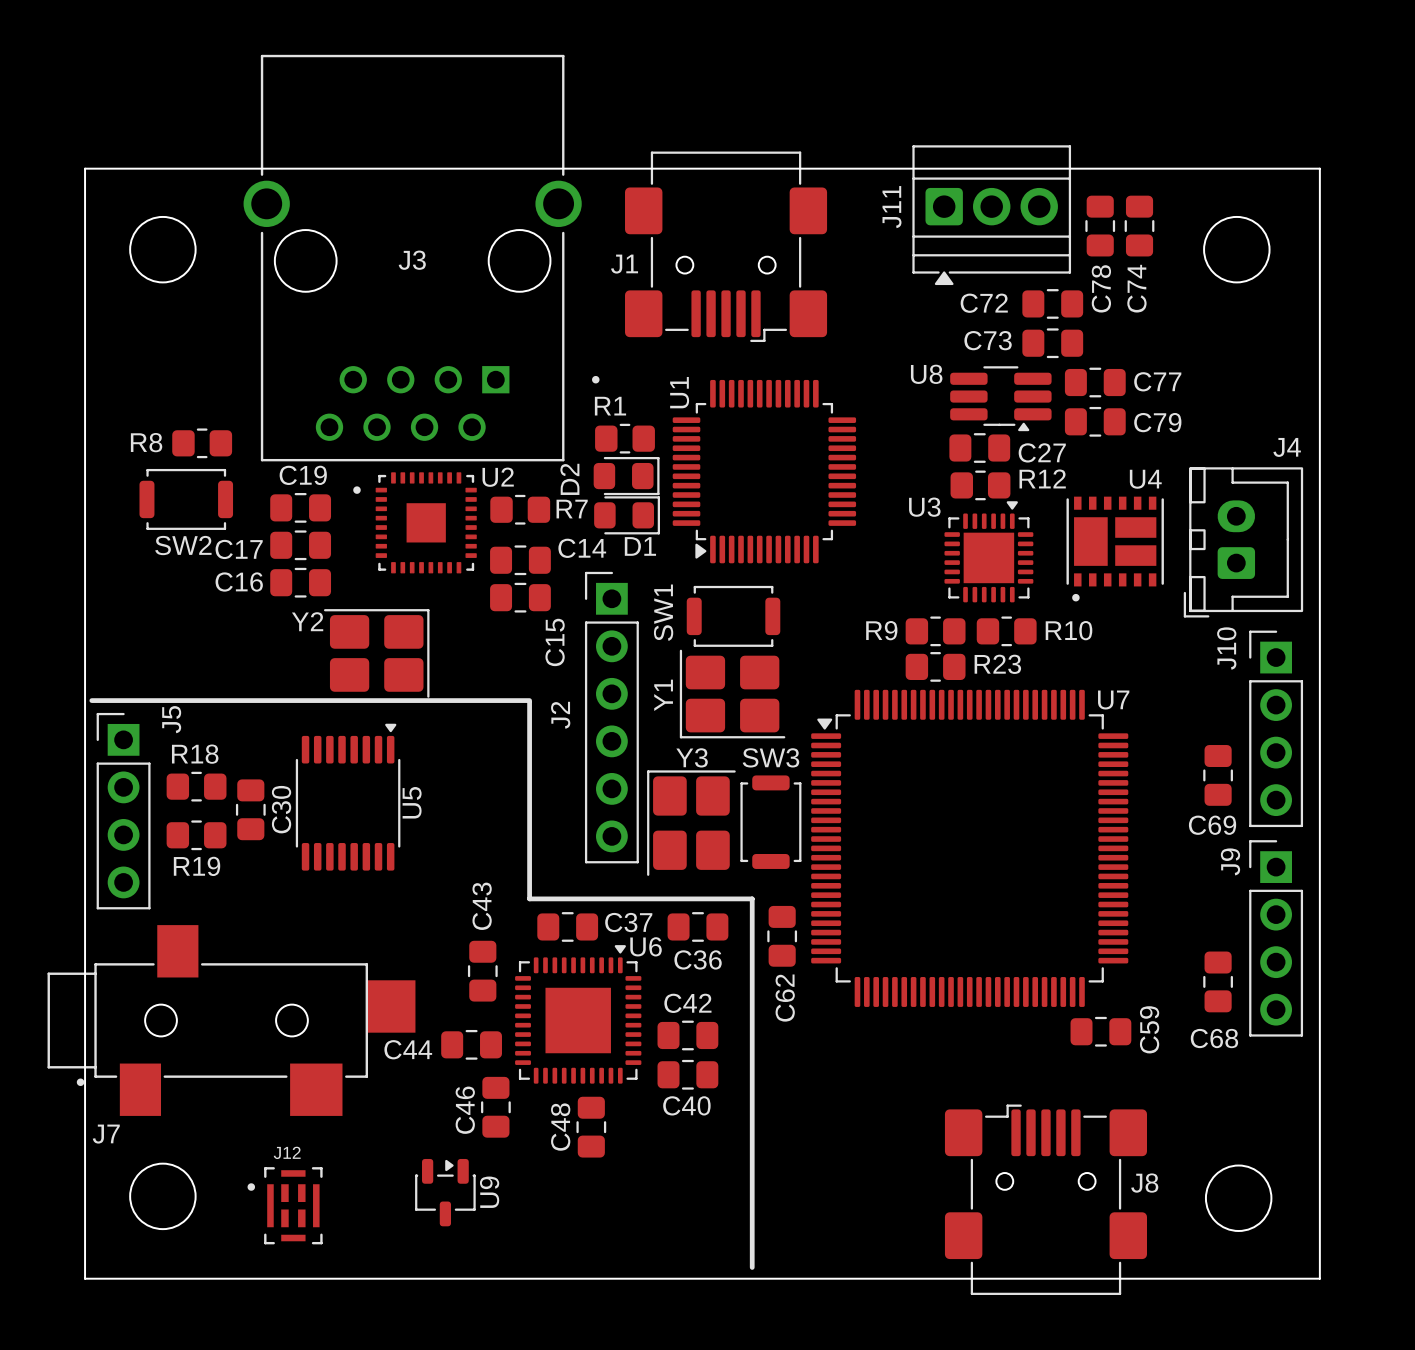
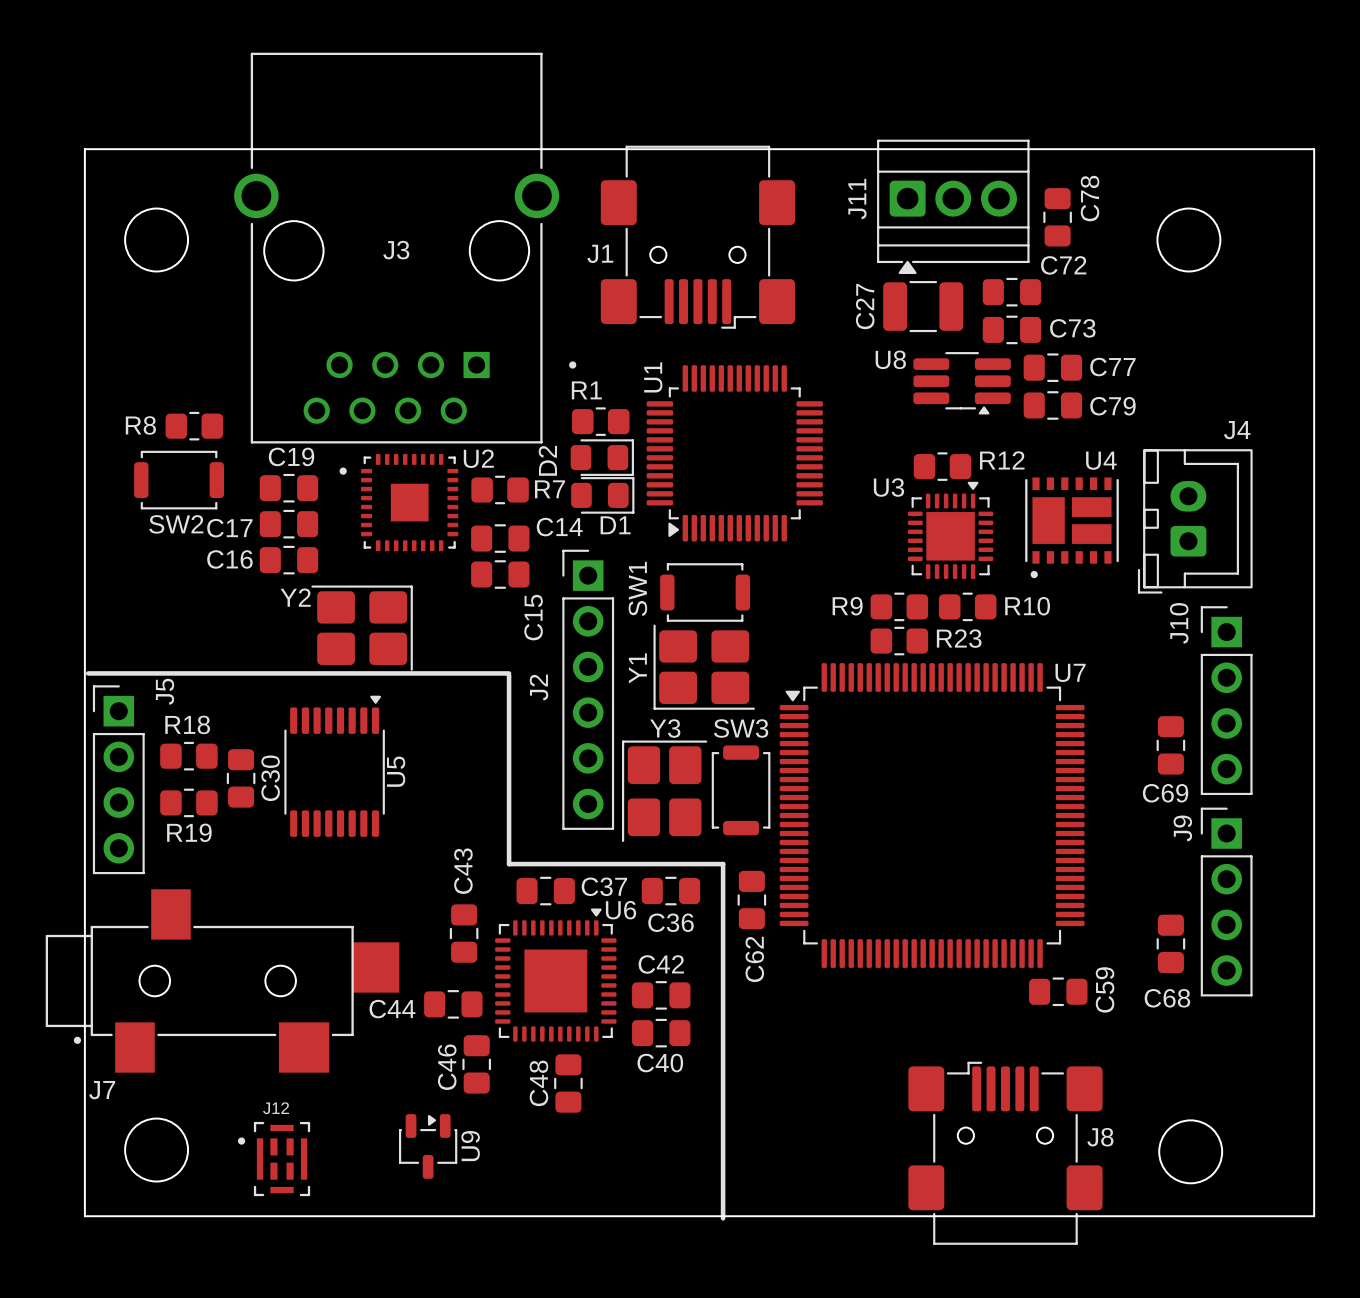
board edge: (85, 168) (1319, 168) (1319, 1278) (85, 1278) (85, 168) -> (84, 149) (84, 1216) (1314, 1216) (1314, 149) (84, 149)
C74: (1139, 226) -> none
C78 name position: C78 (1101, 288) -> C78 (1090, 198)
C72 name position: C72 (984, 303) -> C72 (1063, 265)
C73 name position: C73 (988, 340) -> C73 (1072, 328)
C27 footprint: [949, 433, 1011, 463] -> [883, 281, 964, 333]
C27 name position: C27 (1042, 452) -> C27 (865, 306)

